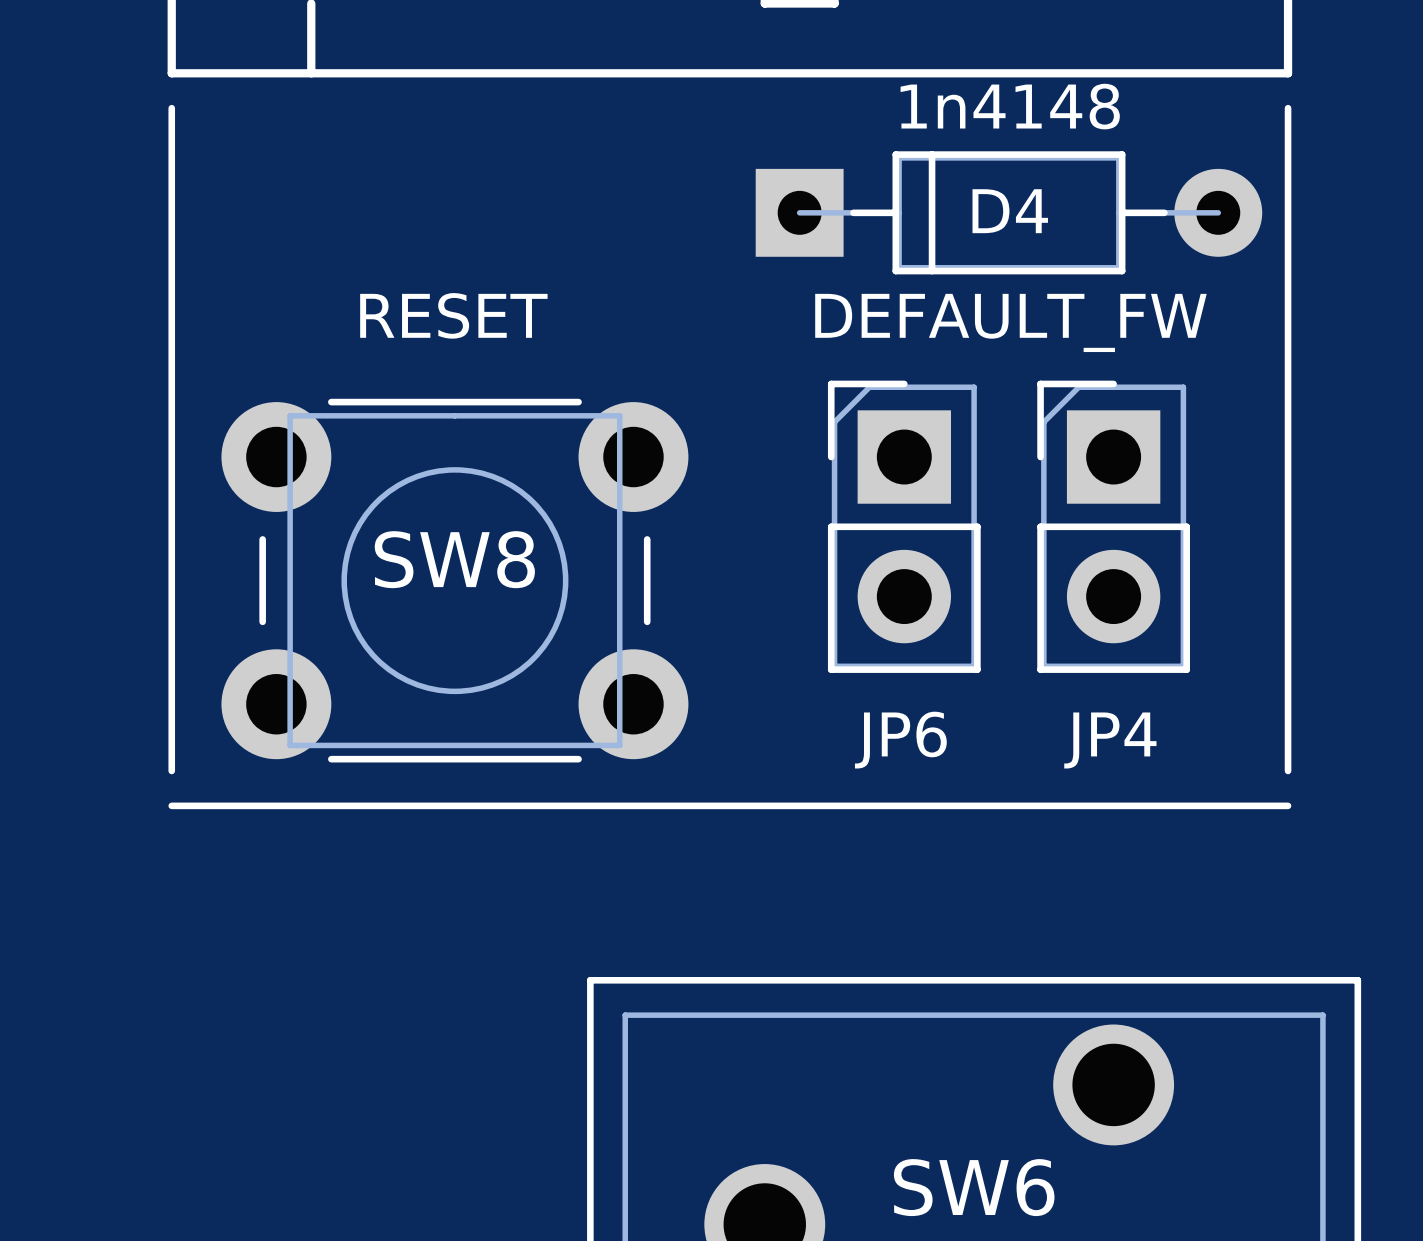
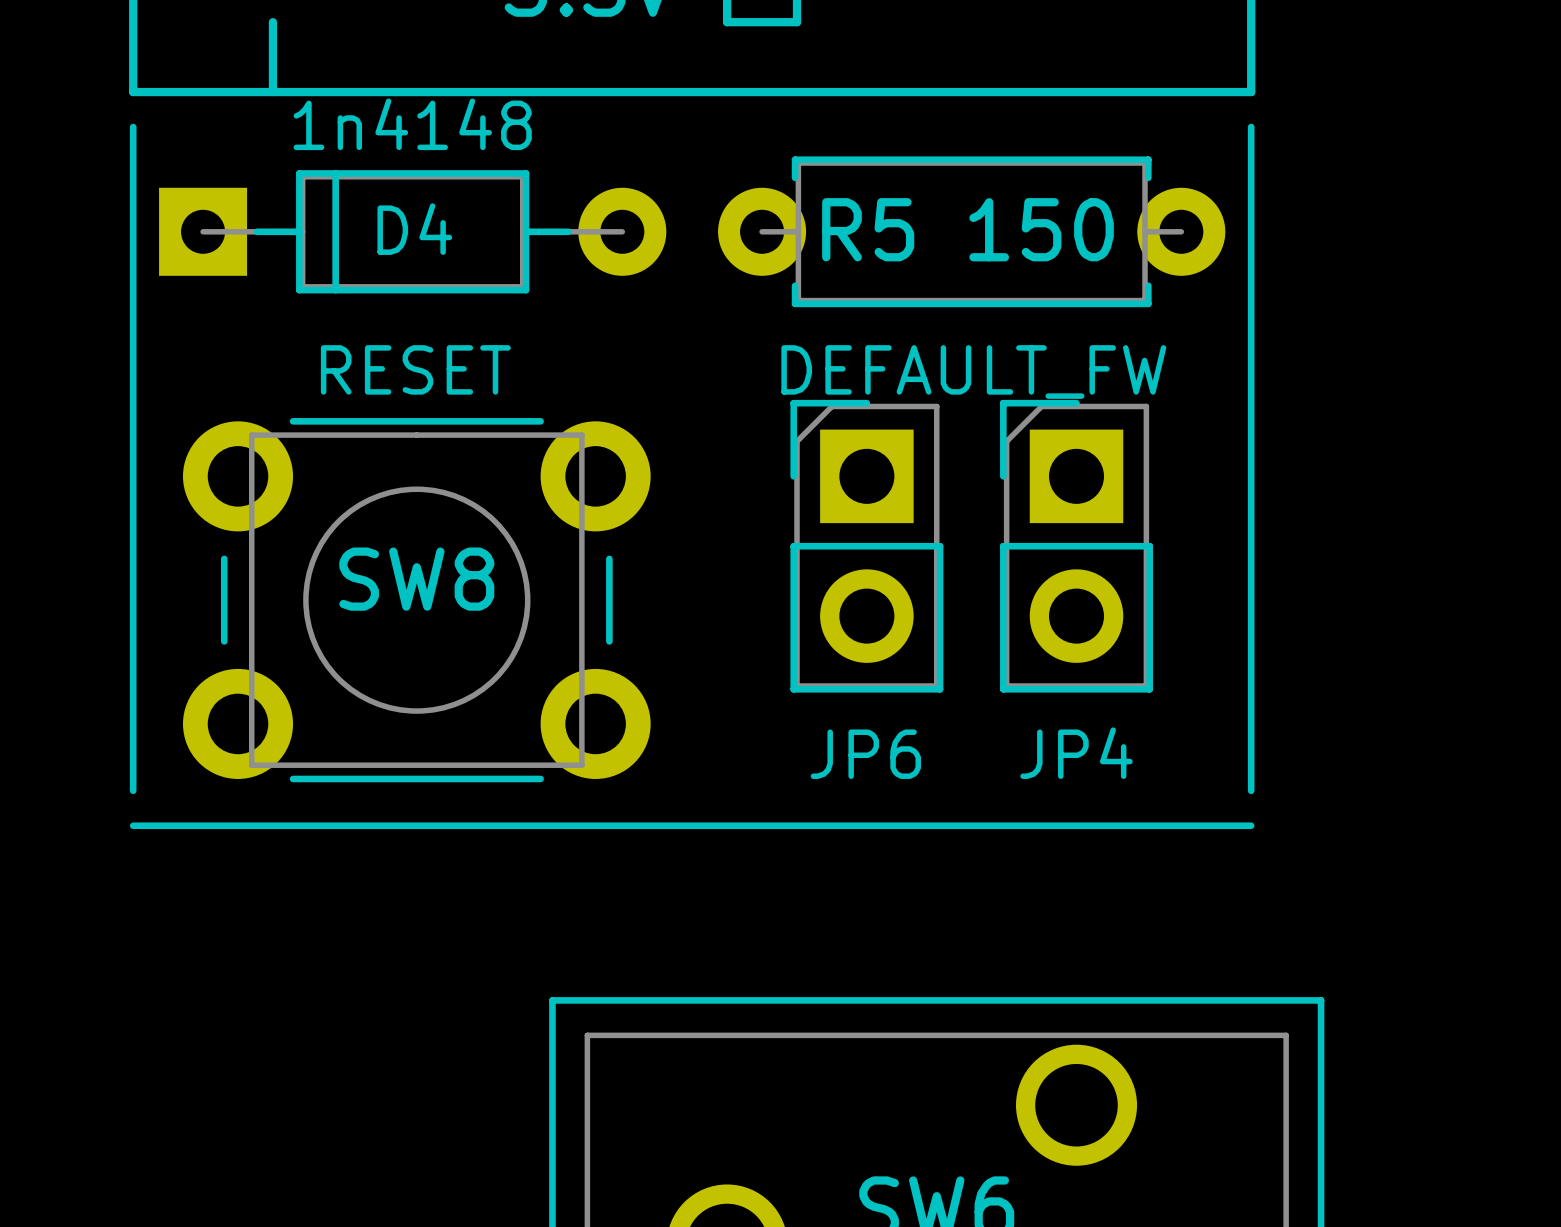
D4 position: (1008, 212) -> (412, 231)
R5: none -> 150 (971, 231)
SW8 value position: RESET (453, 315) -> RESET (415, 369)
JP4 value position: DEFAULT_FW (1010, 322) -> DEFAULT_FW (973, 372)

